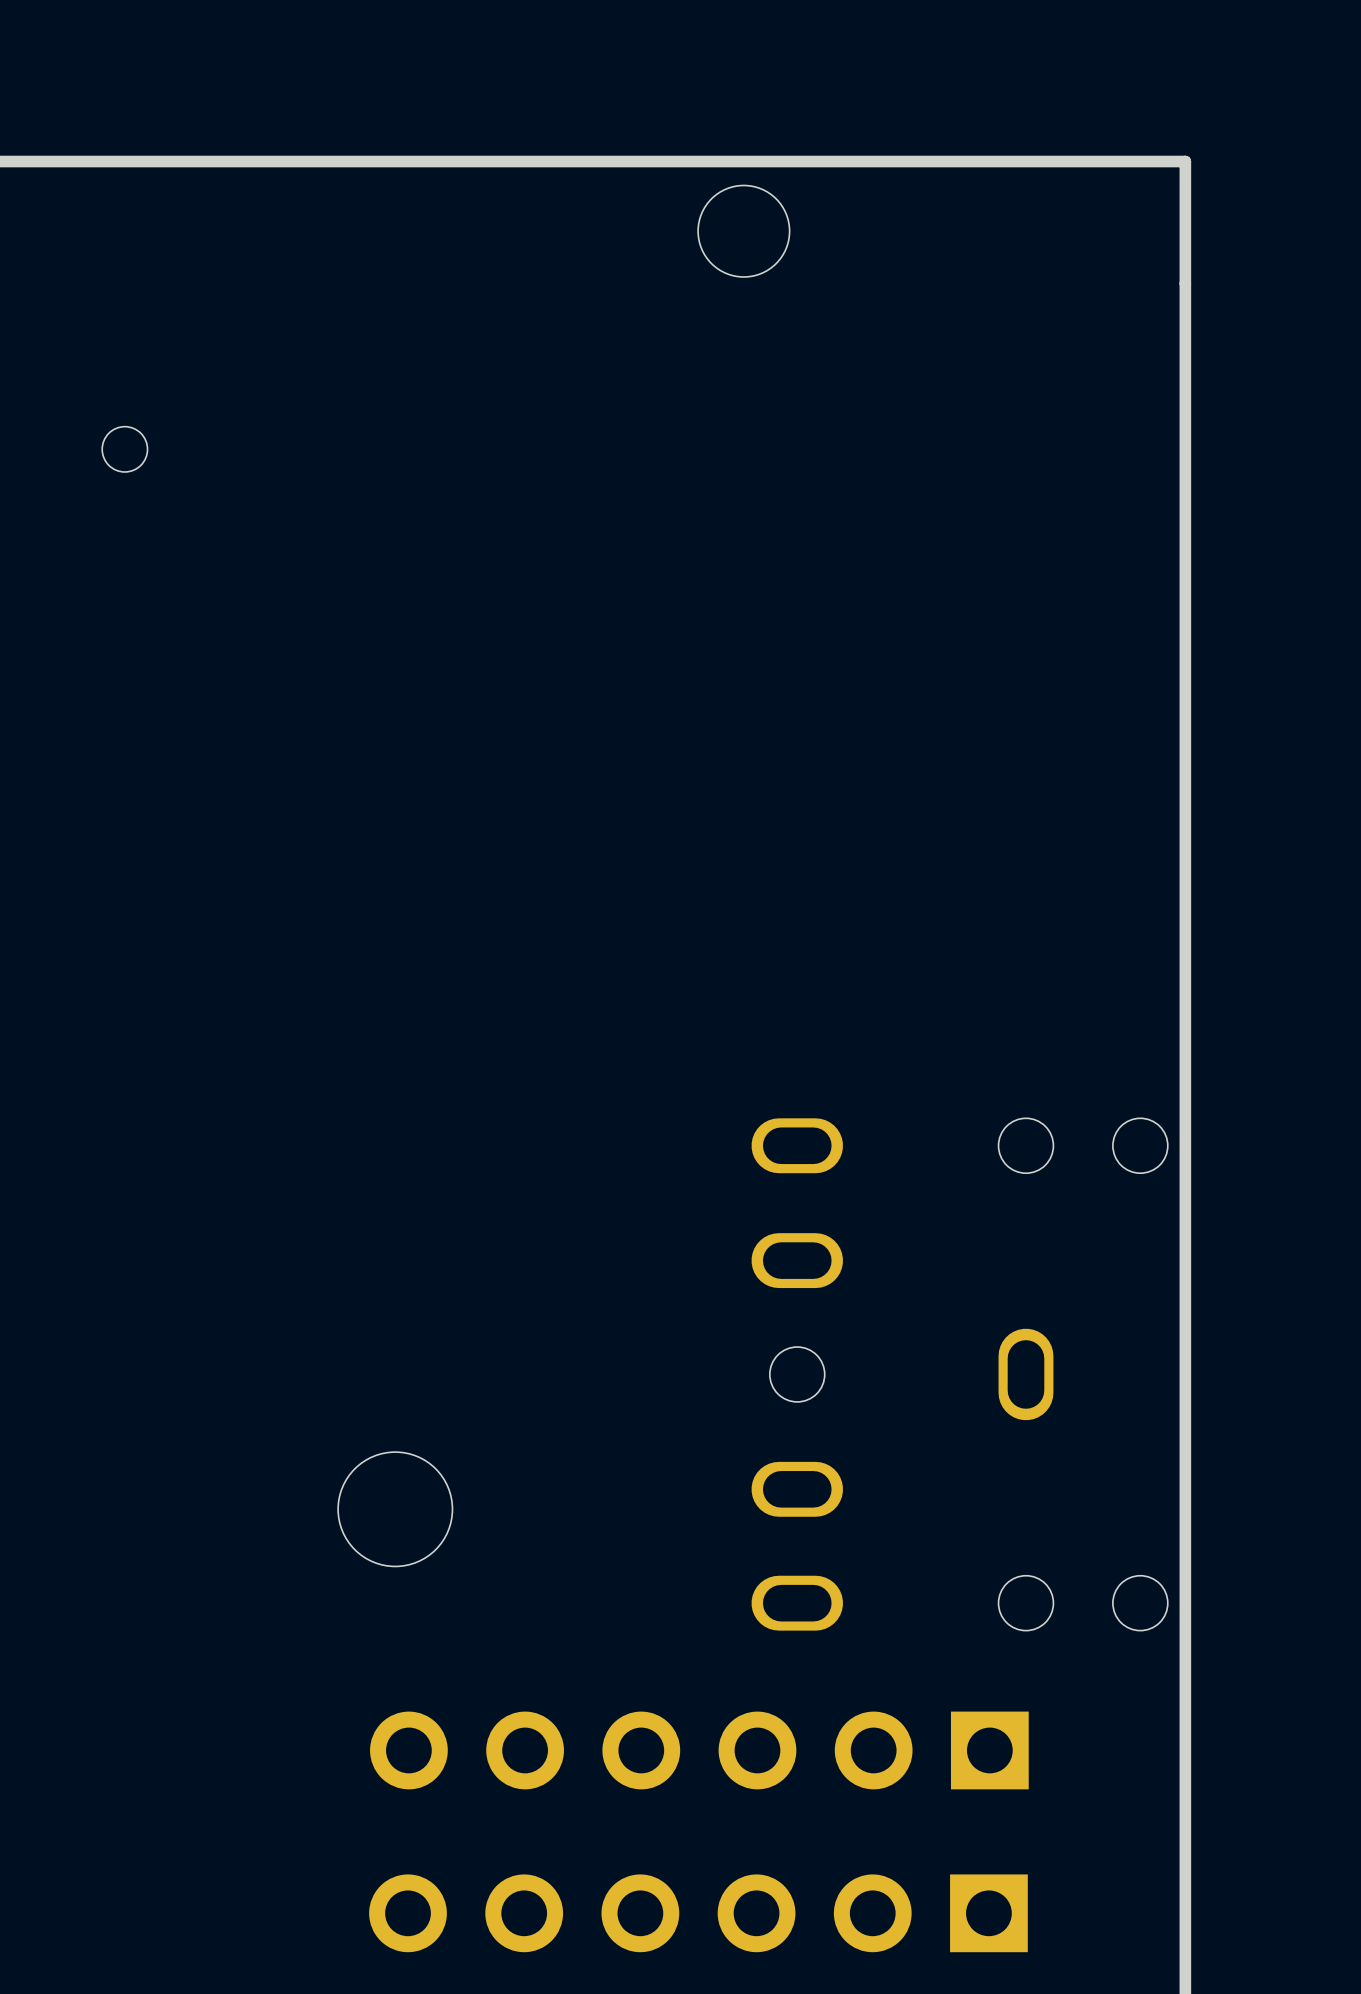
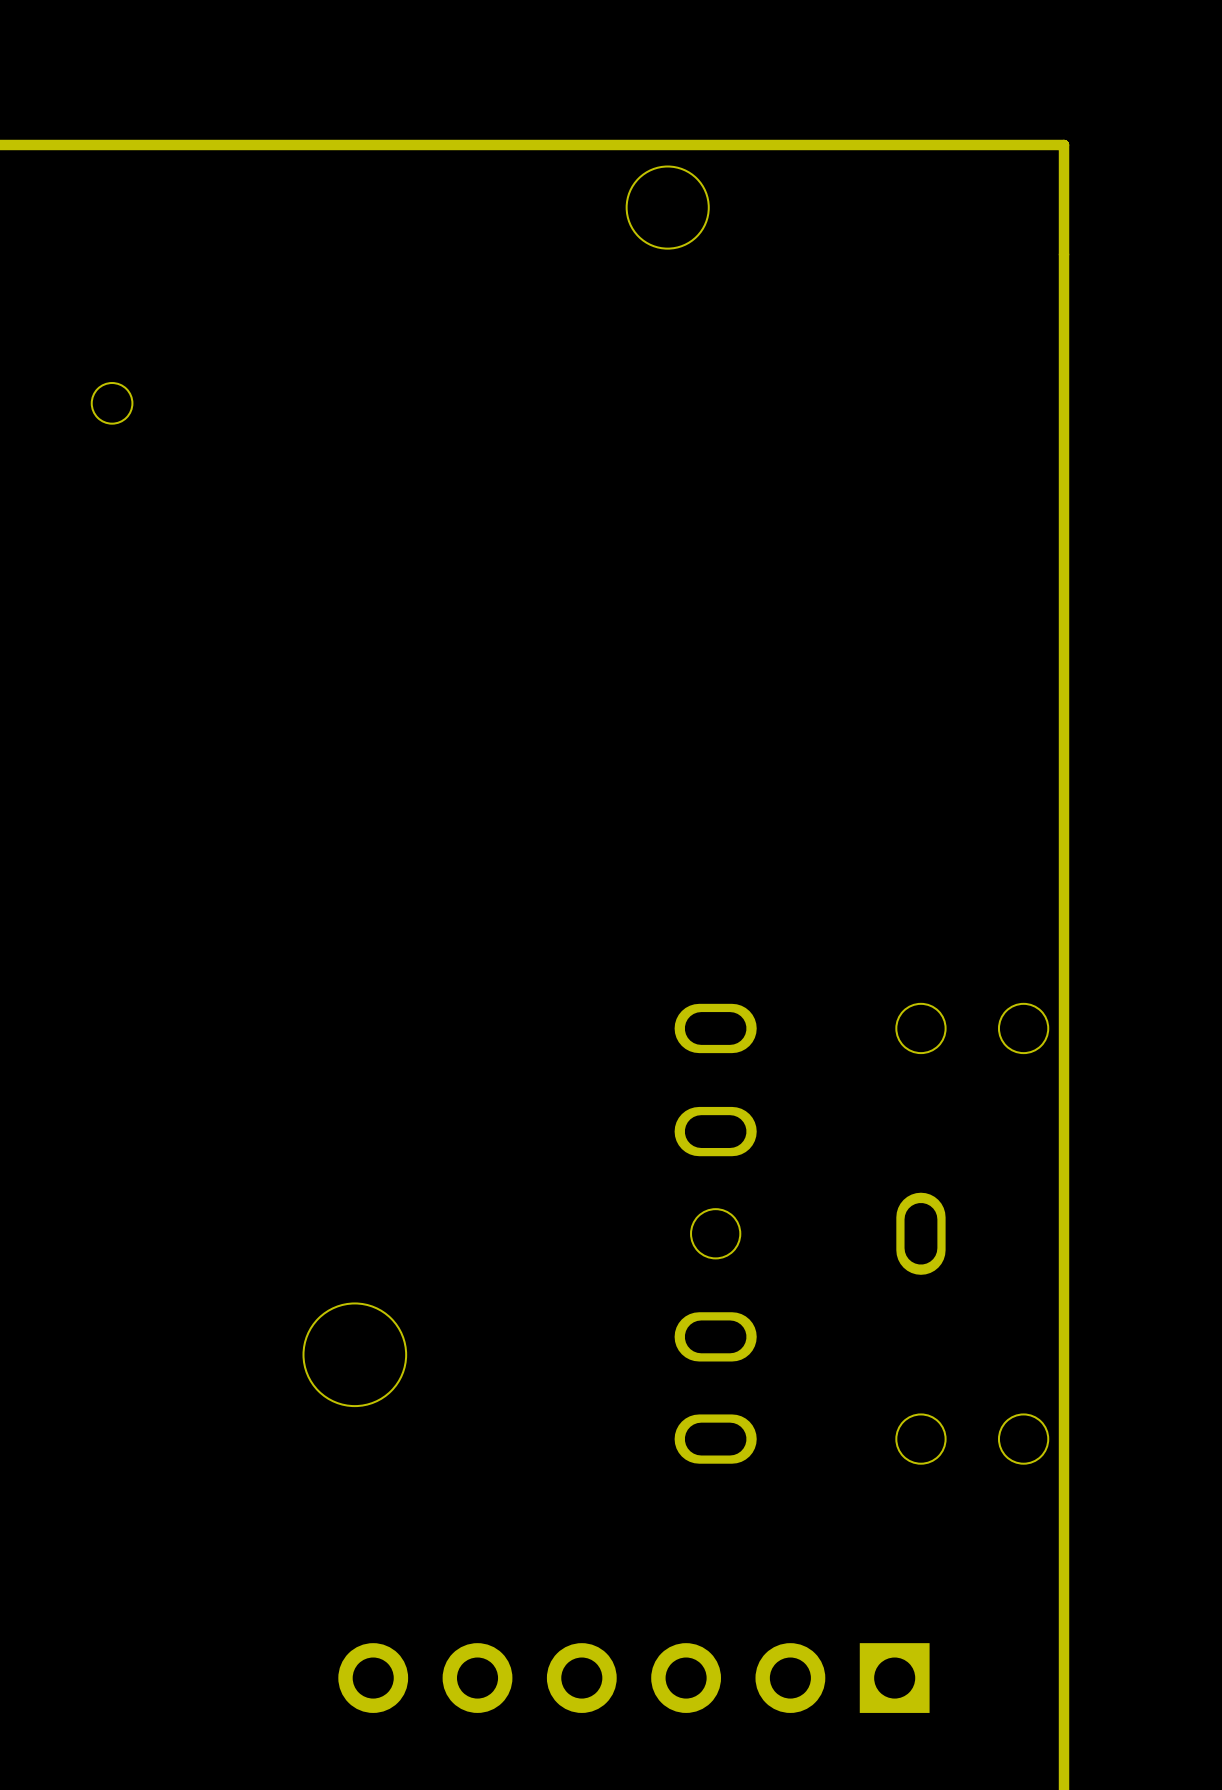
part: (699, 1750) -> none
part position: (698, 1913) -> (633, 1678)

